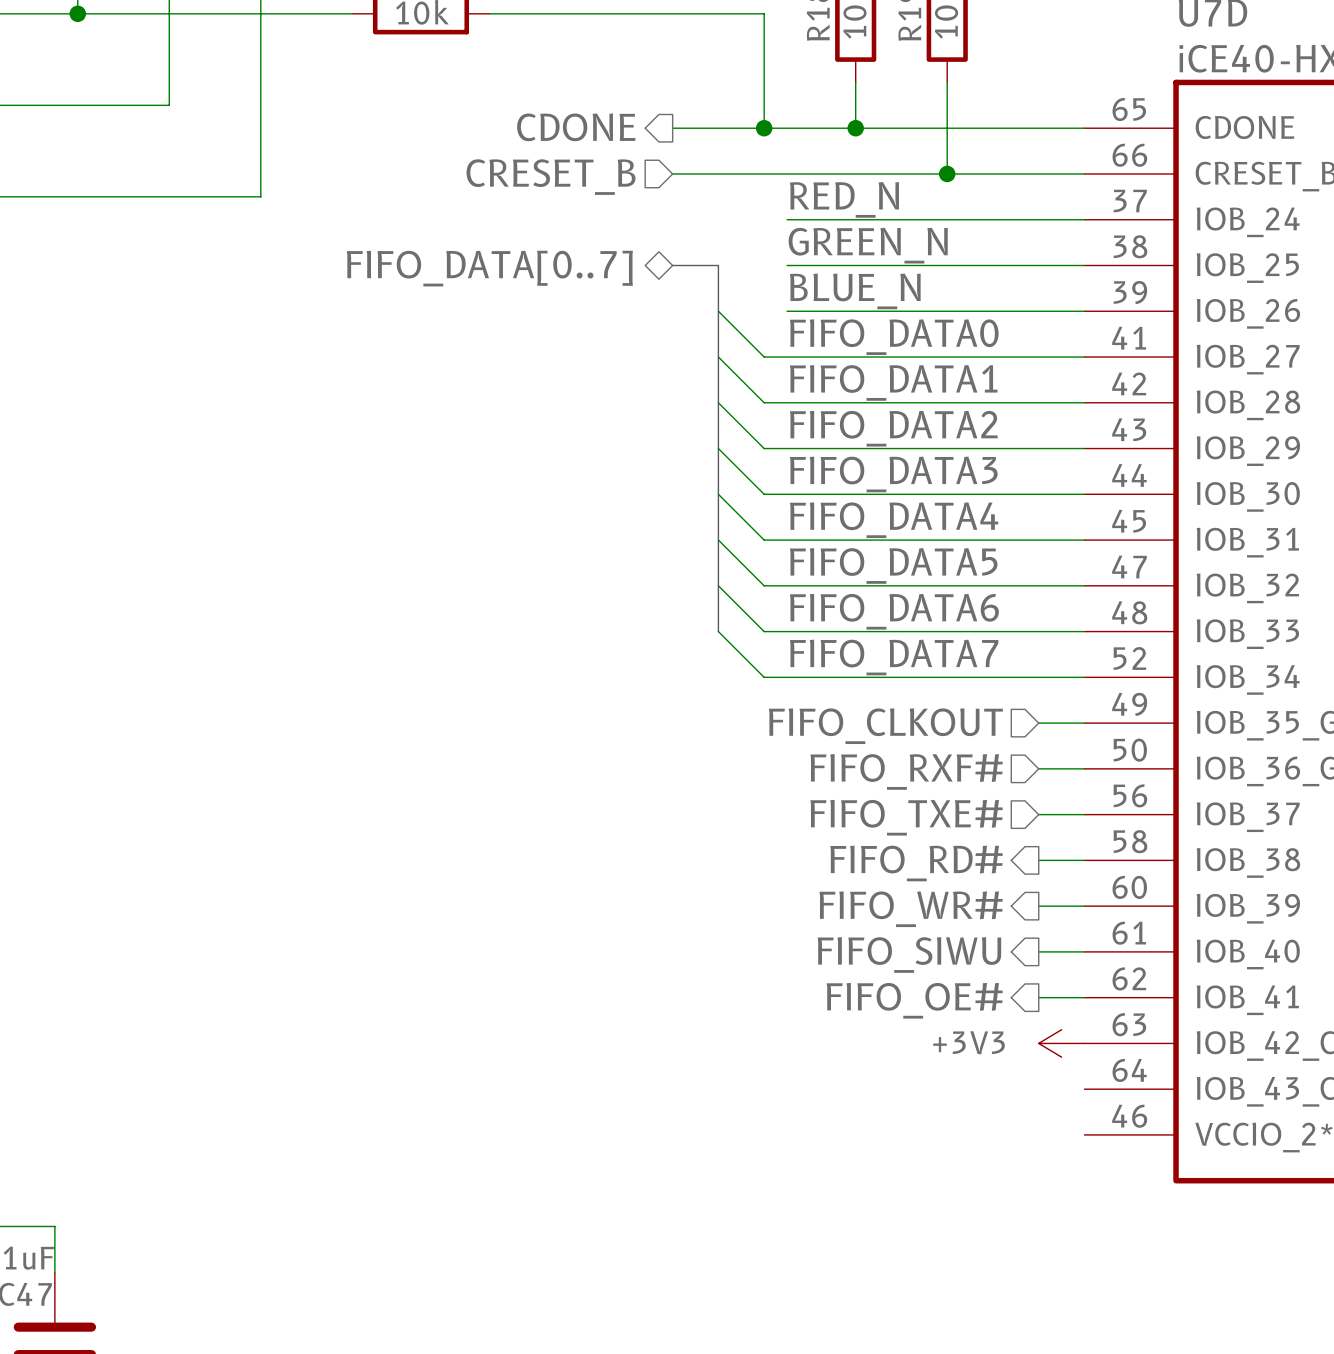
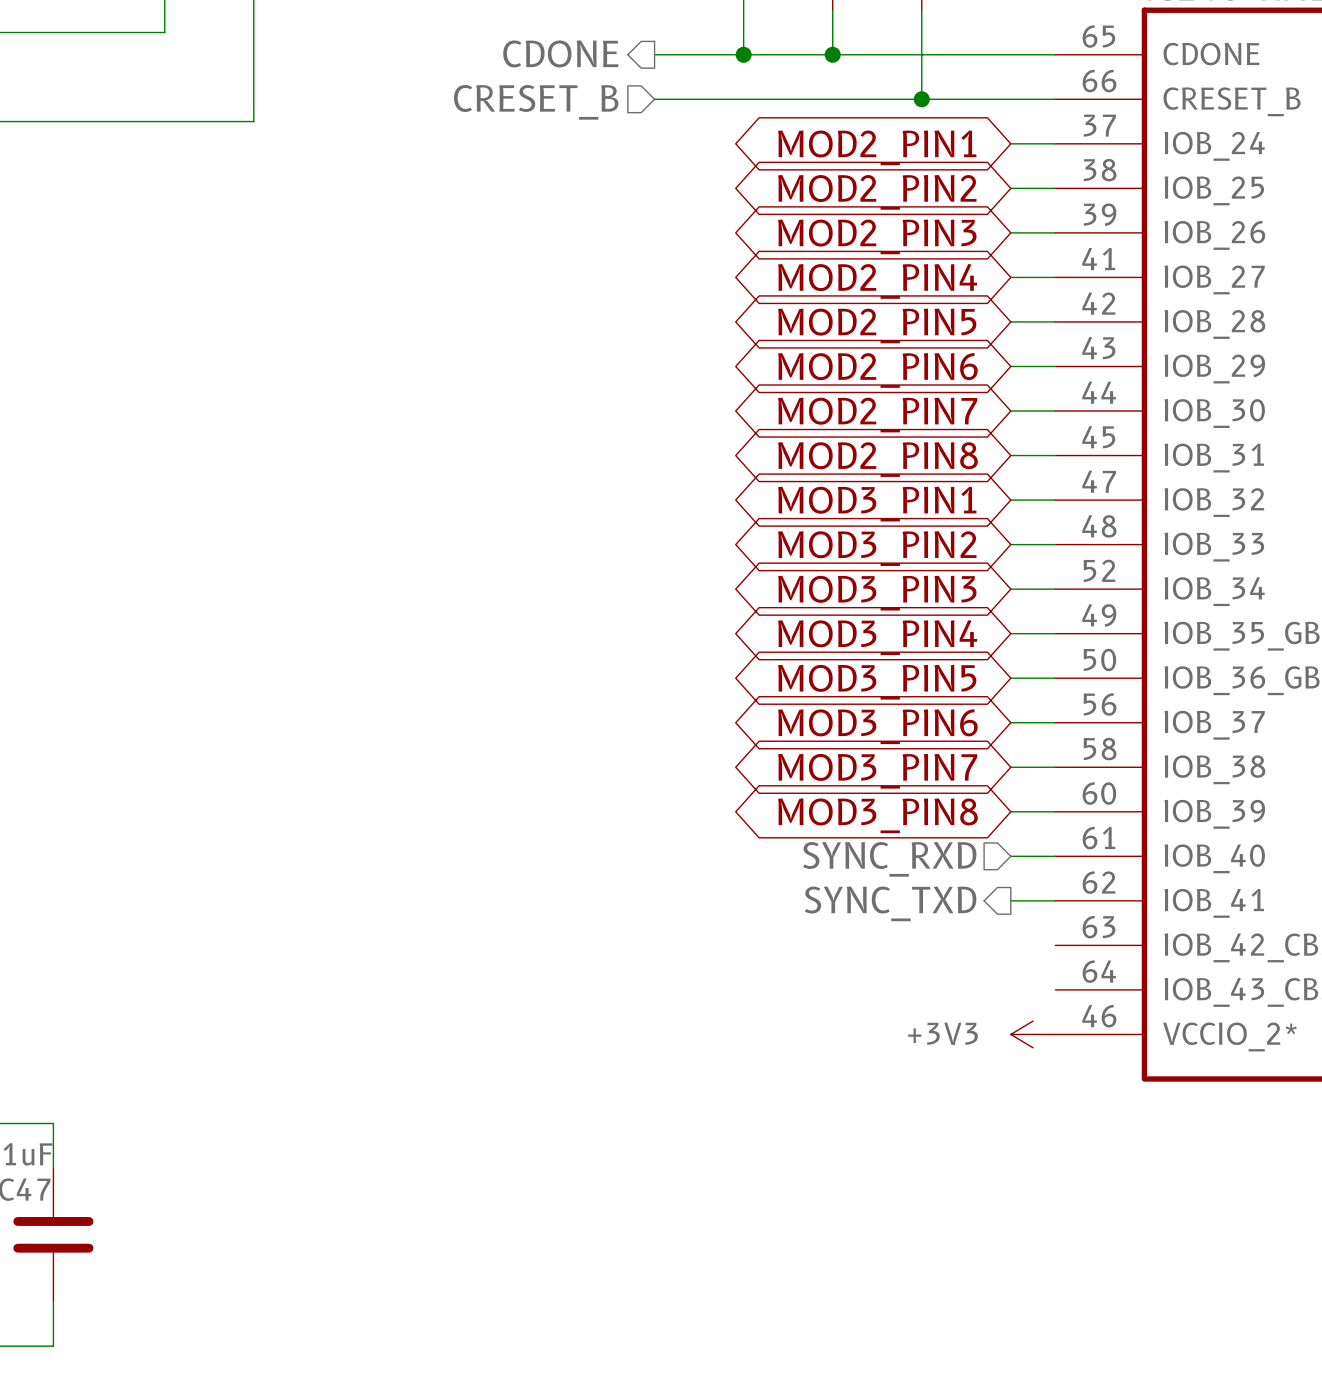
label: RED_N (844, 199) -> none
wire: (787, 219) (1038, 219) -> none
global label: none -> MOD2_PIN1 (877, 147)
label: GREEN_N (868, 245) -> none
bus: (672, 265) (718, 265) (718, 631) -> none
wire: (787, 265) (1038, 265) -> none
hierarchical label: FIFO_DATA[0..7] (489, 268) -> none
global label: none -> MOD2_PIN2 (877, 192)
label: BLUE_N (855, 291) -> none
wire: (718, 311) (764, 357) (1038, 357) -> none
wire: (787, 311) (1038, 311) -> none
global label: none -> MOD2_PIN3 (877, 236)
label: FIFO_DATA0 (894, 337) -> none
wire: (718, 357) (764, 402) (1038, 402) -> none
global label: none -> MOD2_PIN4 (877, 281)
label: FIFO_DATA1 (893, 382) -> none
wire: (718, 402) (764, 448) (1038, 448) -> none
global label: none -> MOD2_PIN5 (877, 325)
label: FIFO_DATA2 (893, 428) -> none
wire: (718, 448) (764, 494) (1038, 494) -> none
global label: none -> MOD2_PIN6 (877, 370)
label: FIFO_DATA3 (893, 474) -> none
wire: (718, 494) (764, 540) (1038, 540) -> none
global label: none -> MOD2_PIN7 (877, 415)
label: FIFO_DATA4 (894, 520) -> none
wire: (718, 540) (764, 585) (1038, 585) -> none
global label: none -> MOD2_PIN8 (877, 459)
label: FIFO_DATA5 (893, 565) -> none
wire: (718, 585) (764, 631) (1038, 631) -> none
global label: none -> MOD3_PIN1 (877, 504)
label: FIFO_DATA6 (894, 611) -> none
wire: (718, 631) (764, 677) (1038, 677) -> none
global label: none -> MOD3_PIN2 (877, 548)
label: FIFO_DATA7 (894, 657) -> none
global label: none -> MOD3_PIN3 (877, 593)
hierarchical label: FIFO_CLKOUT (885, 726) -> none
global label: none -> MOD3_PIN4 (877, 637)
hierarchical label: FIFO_RXF# (906, 771) -> none
global label: none -> MOD3_PIN5 (877, 682)
hierarchical label: FIFO_TXE# (906, 817) -> none
global label: none -> MOD3_PIN6 (877, 726)
hierarchical label: FIFO_RD# (916, 863) -> none
global label: none -> MOD3_PIN7 (877, 771)
hierarchical label: FIFO_WR# (911, 909) -> none
global label: none -> MOD3_PIN8 (877, 815)
hierarchical label shape: output (909, 954) -> input (889, 859)
hierarchical label: FIFO_SIWU (909, 954) -> SYNC_RXD (889, 859)
hierarchical label: FIFO_OE# (914, 1000) -> SYNC_TXD (890, 903)
power symbol position: +3V3 (1061, 1043) -> +3V3 (1033, 1034)

